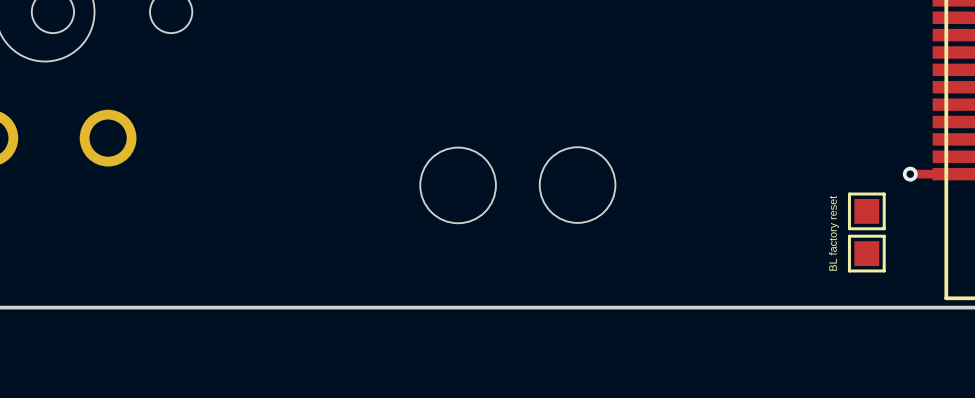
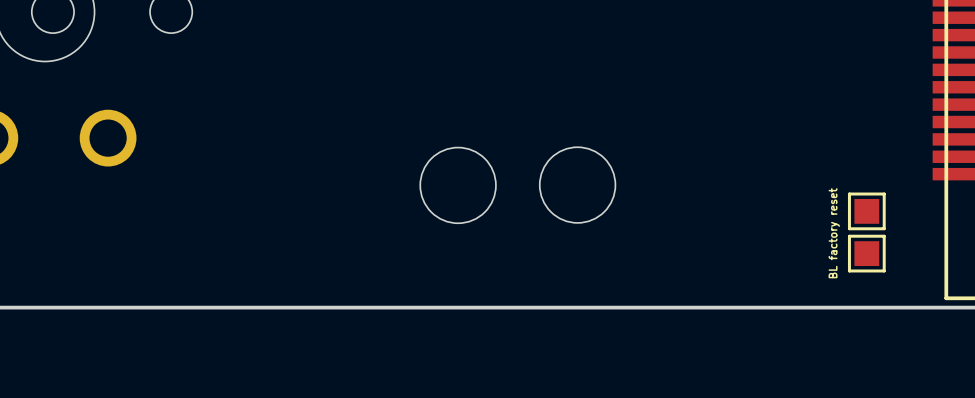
top track: (910, 174) (942, 174) -> none
via: (910, 174) -> none

